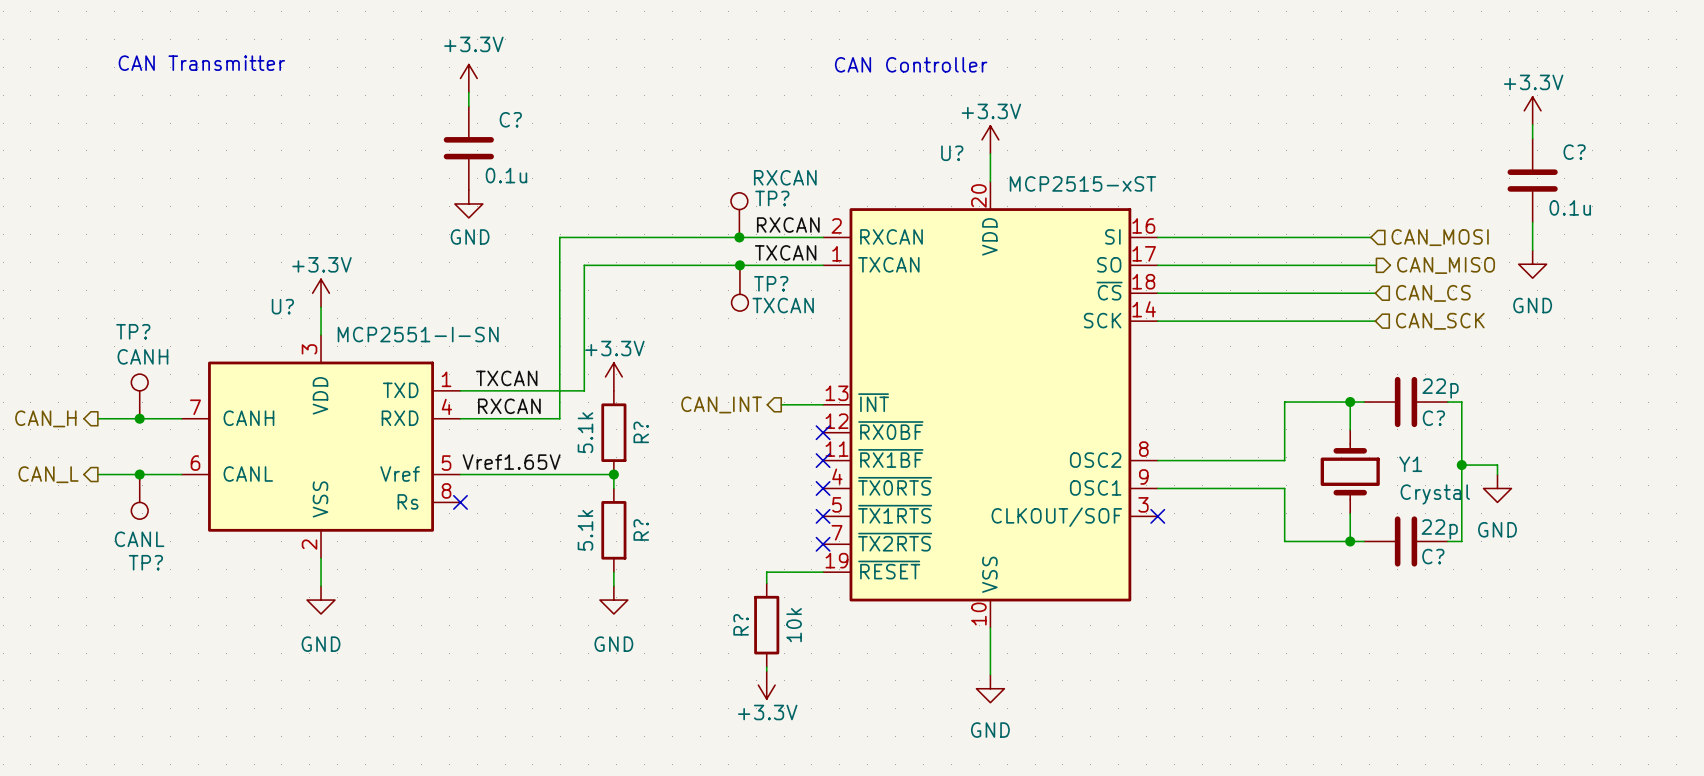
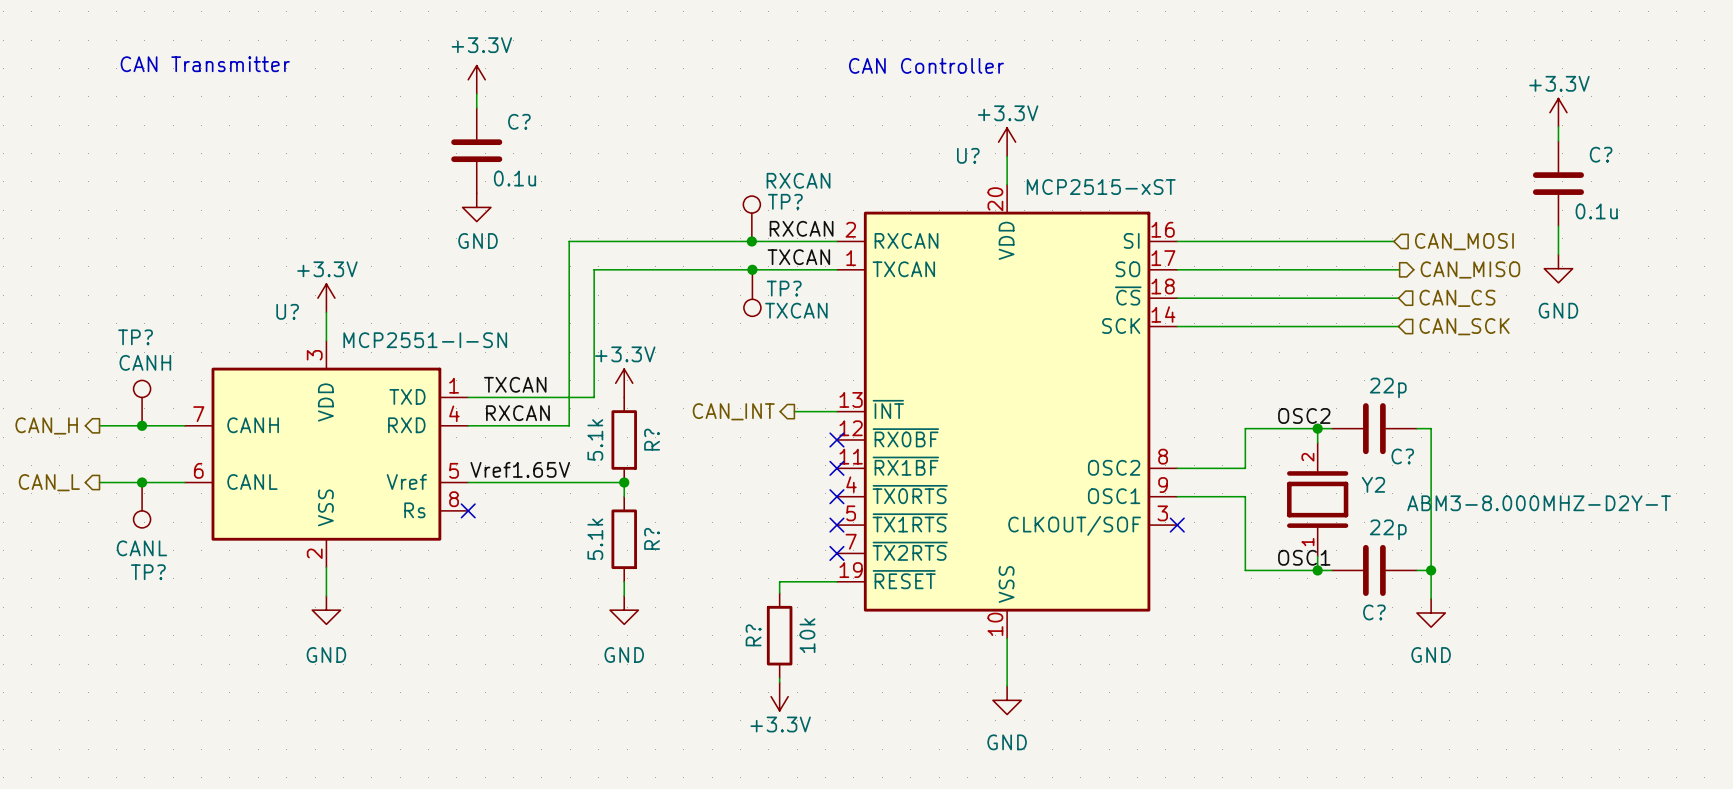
C? value position: 22p (1440, 388) -> 22p (1388, 387)
wire: (1350, 402) (1350, 429) -> none
junction position: (1350, 402) -> (1317, 428)
wire: (1364, 402) (1284, 402) (1284, 460) (1224, 460) -> (1331, 428) (1245, 428) (1245, 468)
C? position: (1406, 402) -> (1374, 428)
wire: (1447, 402) (1461, 402) (1461, 541) (1447, 541) -> none
label: none -> OSC2 (1304, 415)
C? name position: C? (1433, 418) -> C? (1402, 456)
wire: none -> (1317, 428) (1317, 442)
wire: none -> (1416, 428) (1431, 428) (1431, 598)
wire: (1461, 465) (1497, 465) (1497, 474) -> none
junction: (1461, 465) -> none
Y1: Crystal (1350, 471) -> none
wire: (1224, 488) (1284, 488) (1284, 541) (1364, 541) -> (1245, 496) (1245, 570) (1331, 570)
power symbol position: GND (1497, 488) -> GND (1431, 612)
Y2: none -> ABM3-8.000MHZ-D2Y-T (1317, 499)
wire: (1350, 513) (1350, 541) -> none
C? value position: 22p (1439, 529) -> 22p (1388, 529)
junction: (1350, 541) -> none
C? position: (1406, 541) -> (1374, 570)
wire: none -> (1317, 556) (1317, 570)
label: none -> OSC1 (1304, 557)
C? name position: C? (1433, 556) -> C? (1374, 612)
junction: none -> (1317, 570)
wire: none -> (1416, 570) (1431, 570)
junction: none -> (1431, 570)

